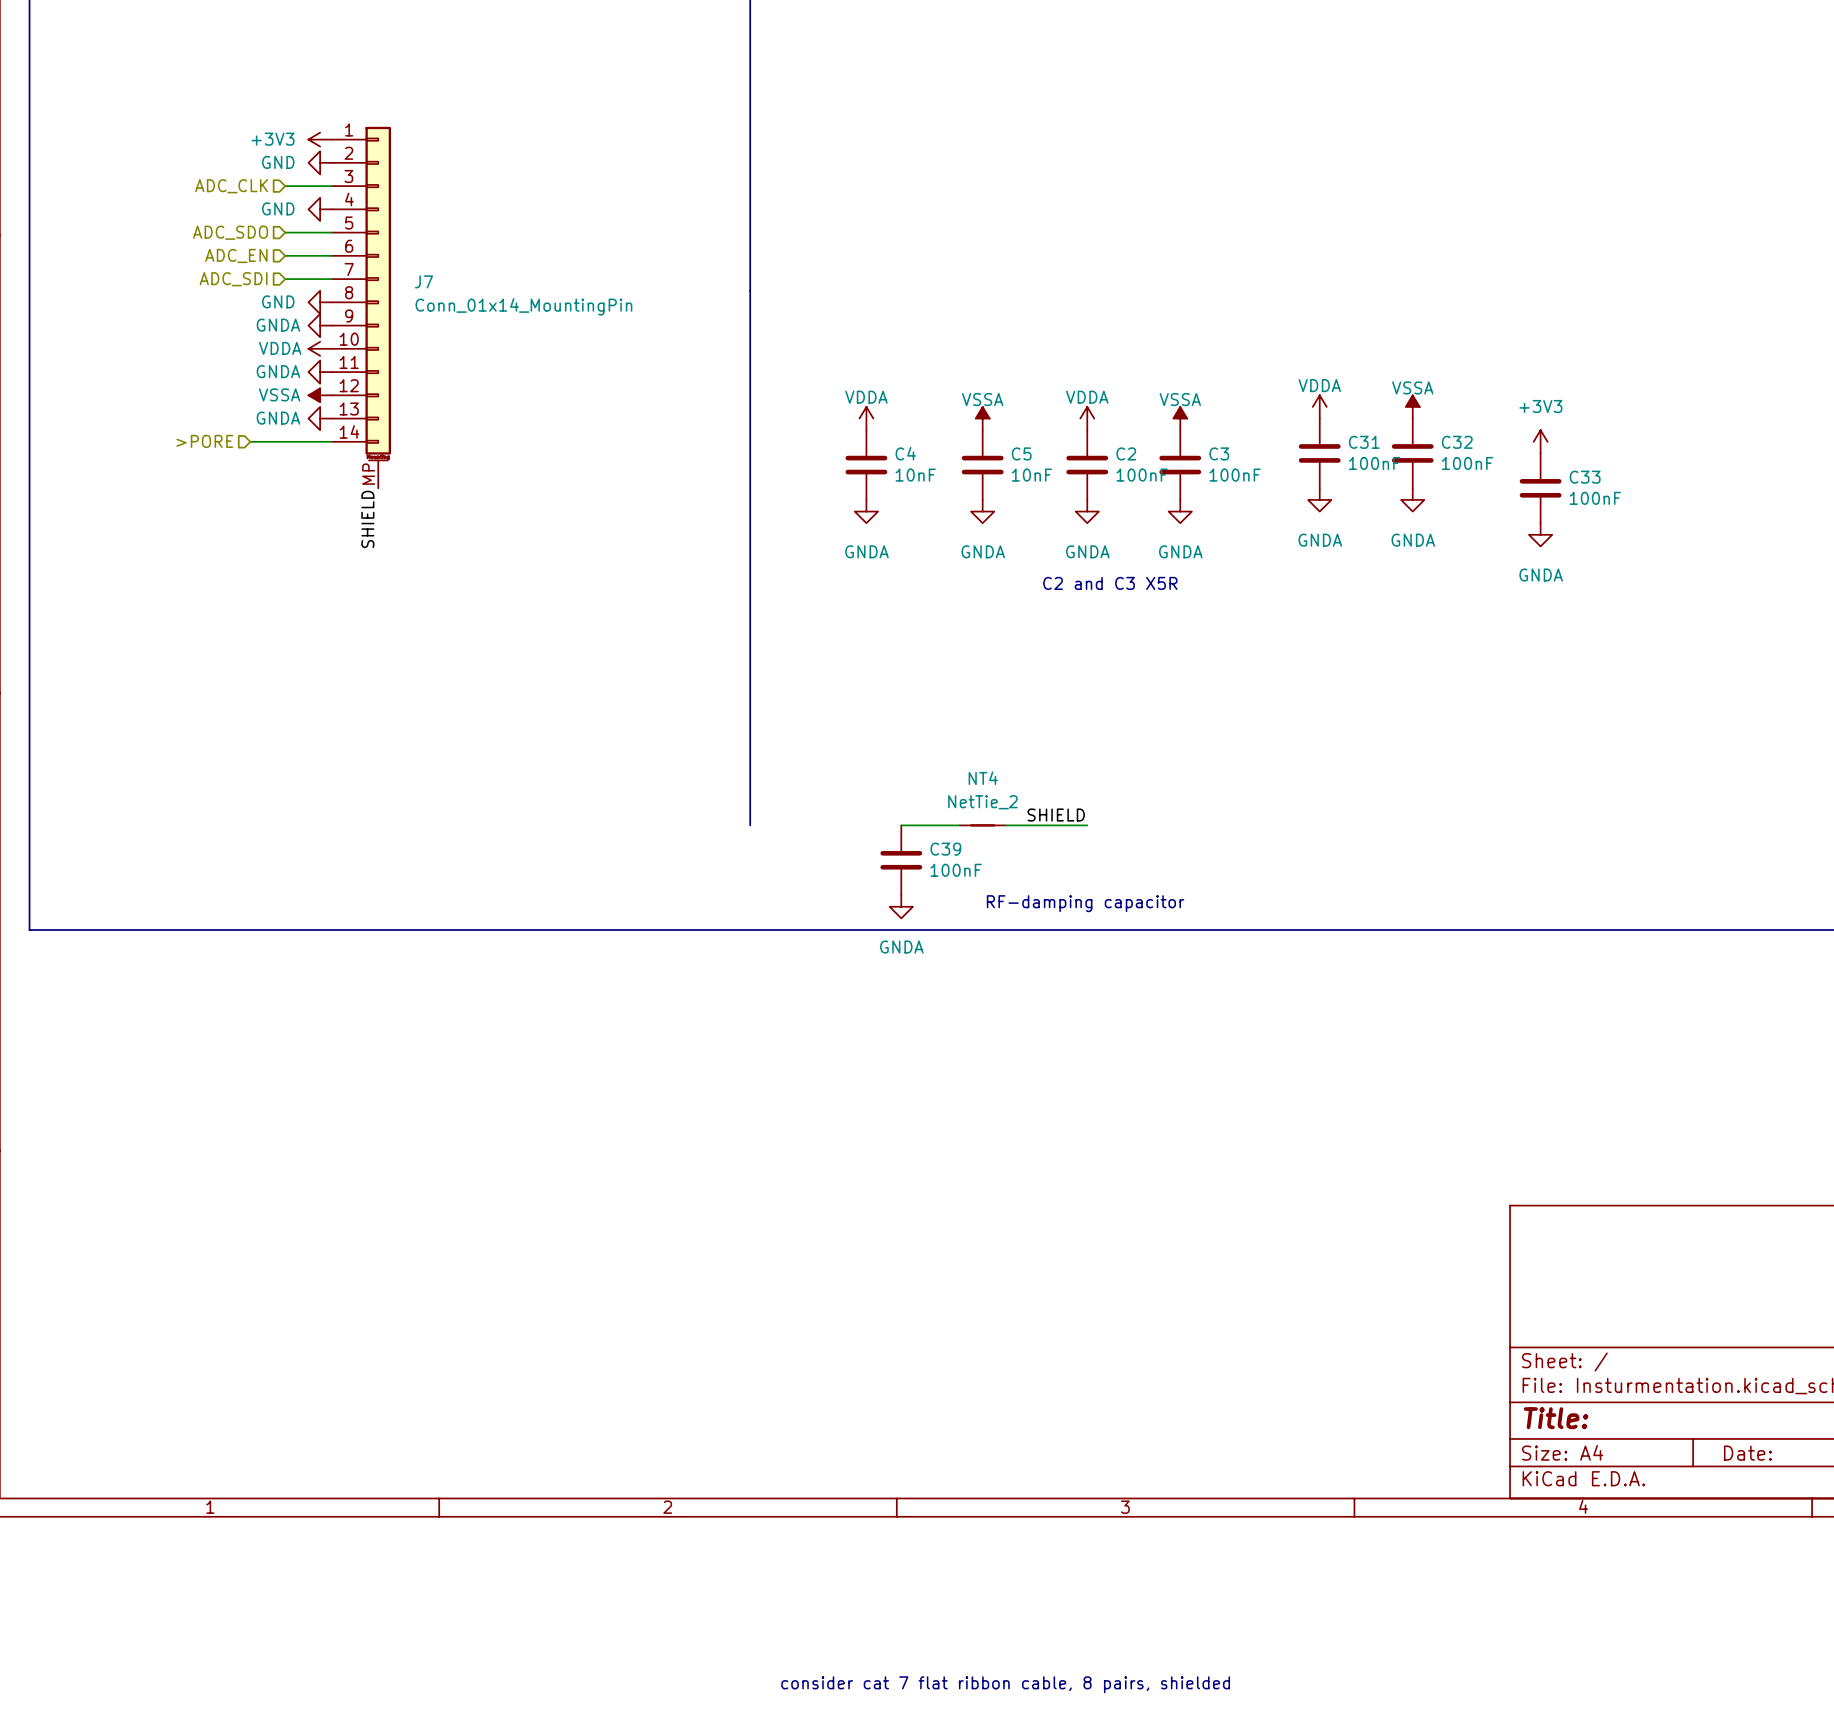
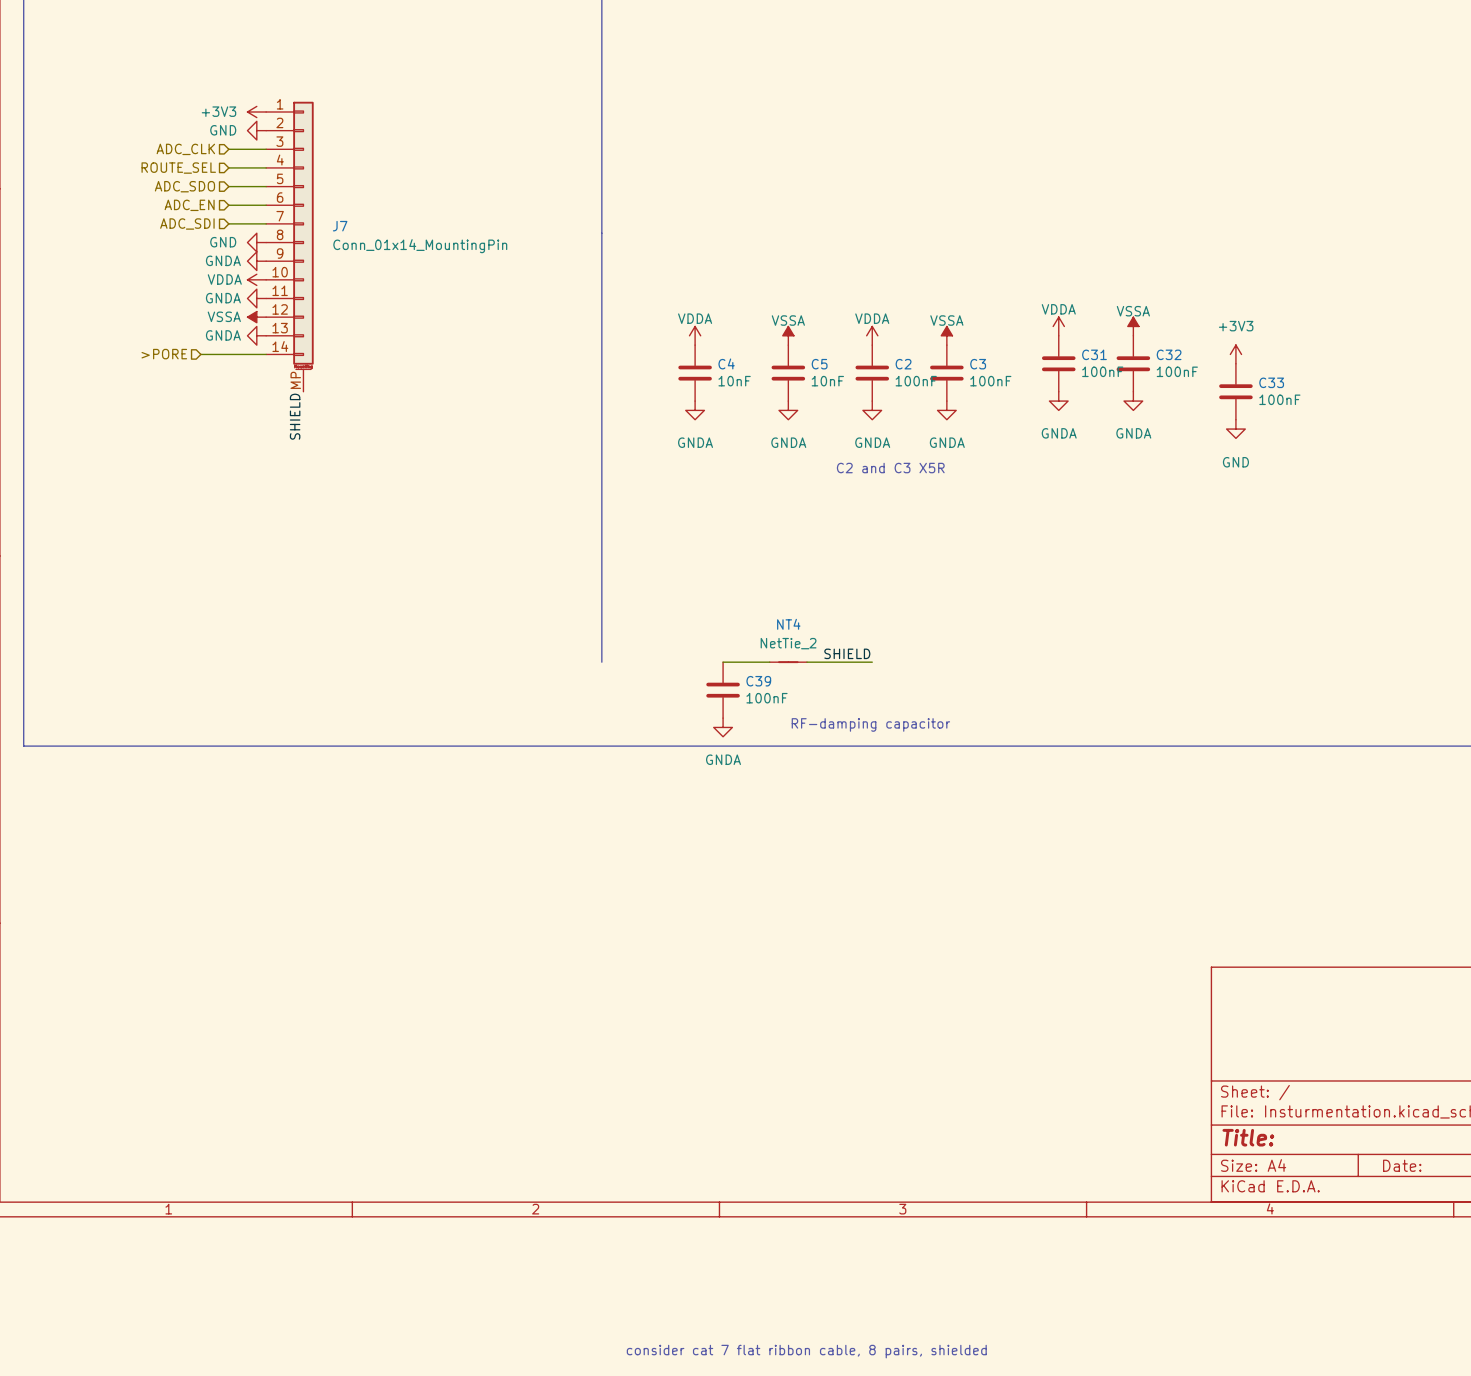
hierarchical label: none -> ROUTE_SEL (178, 168)
wire: none -> (228, 167) (266, 167)
power symbol: GND (320, 209) -> none
power symbol: GNDA (1540, 534) -> GND (1235, 429)

